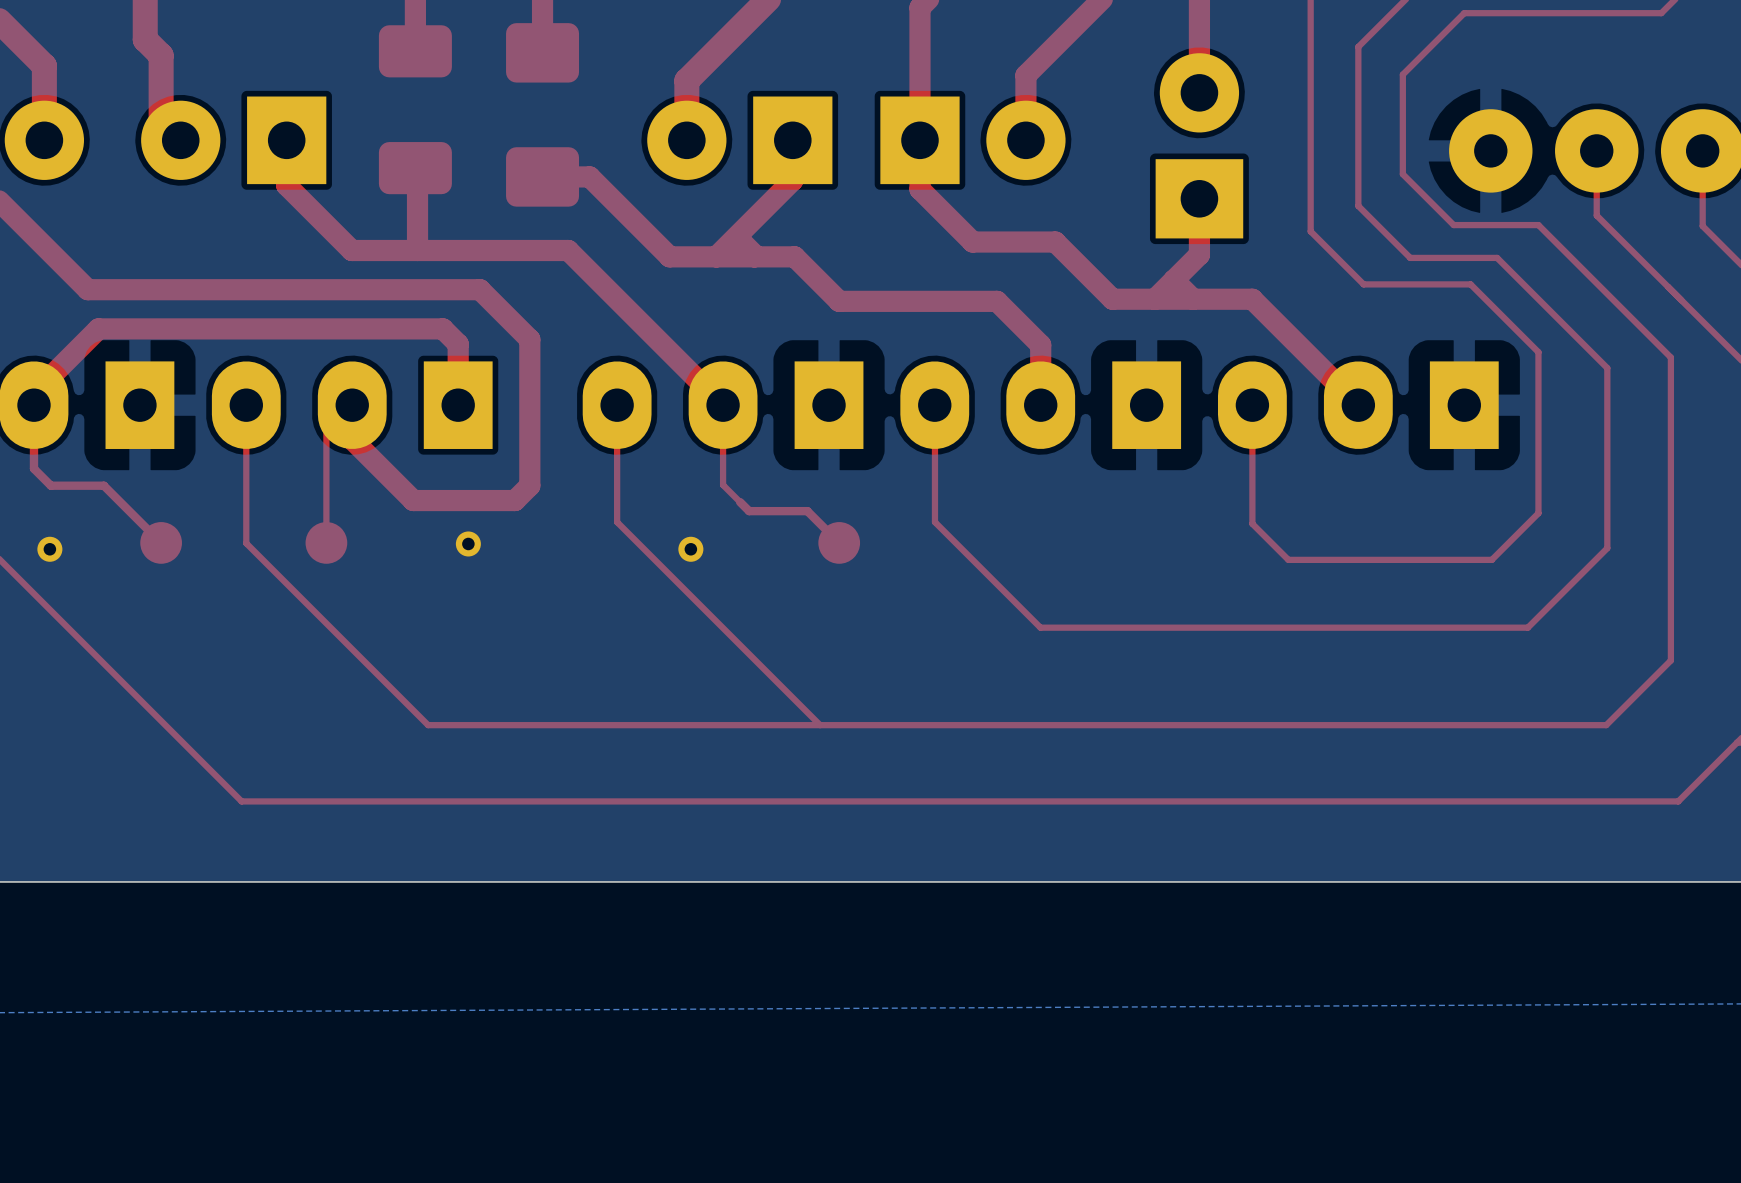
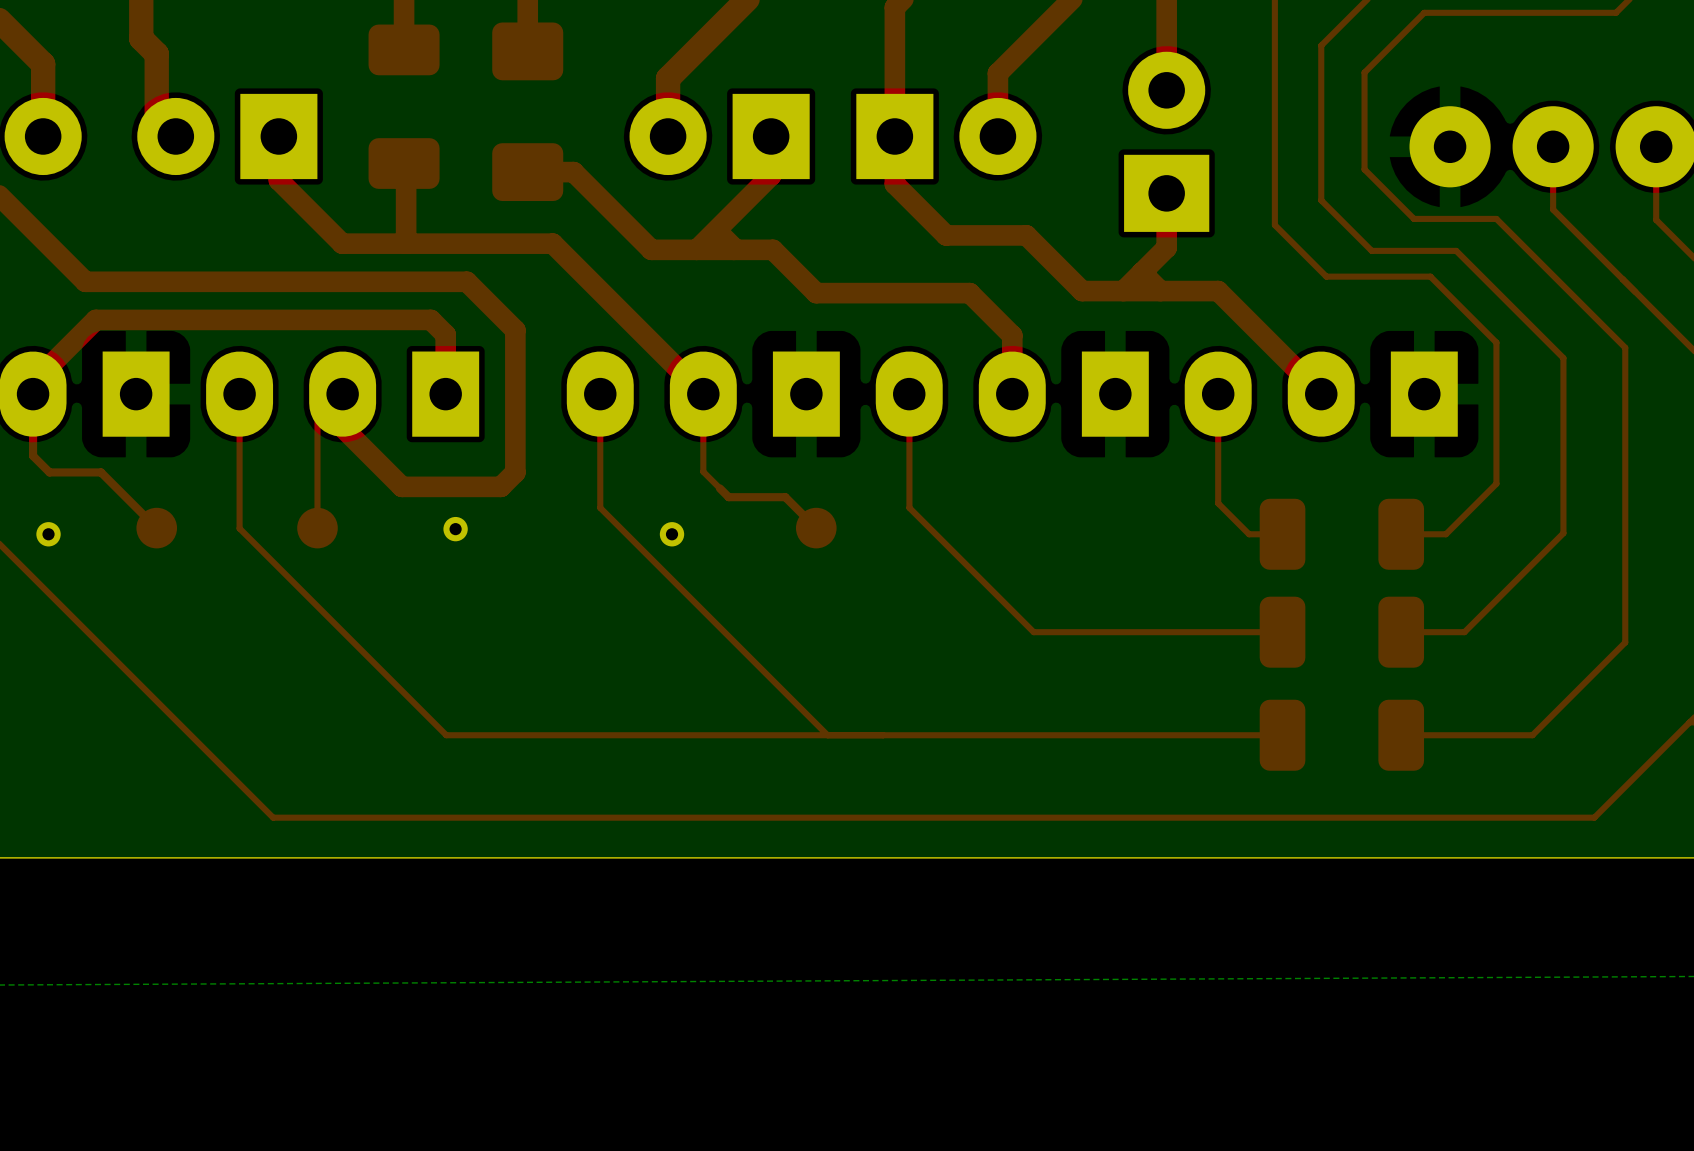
top track: (1538, 497) (1538, 513) (1491, 559) (1288, 559) (1252, 523) (1252, 517) -> (1496, 483) (1445, 534) (1401, 534)
top track: none -> (1218, 503) (1249, 534) (1282, 534)
part: none -> (1341, 534)
top track: (1527, 627) (1040, 627) -> (1282, 632) (1033, 632) (1012, 610)
top track: none -> (1486, 610) (1464, 632) (1401, 632)
part: none -> (1341, 632)
top track: none -> (797, 705) (827, 735)
top track: (1606, 725) (428, 725) -> (1282, 735) (446, 735) (416, 705)
top track: none -> (1562, 705) (1532, 735) (1401, 735)
part: none -> (1341, 735)
top track: (1678, 801) (241, 801) -> (1632, 779) (1594, 817) (273, 817) (235, 779)

